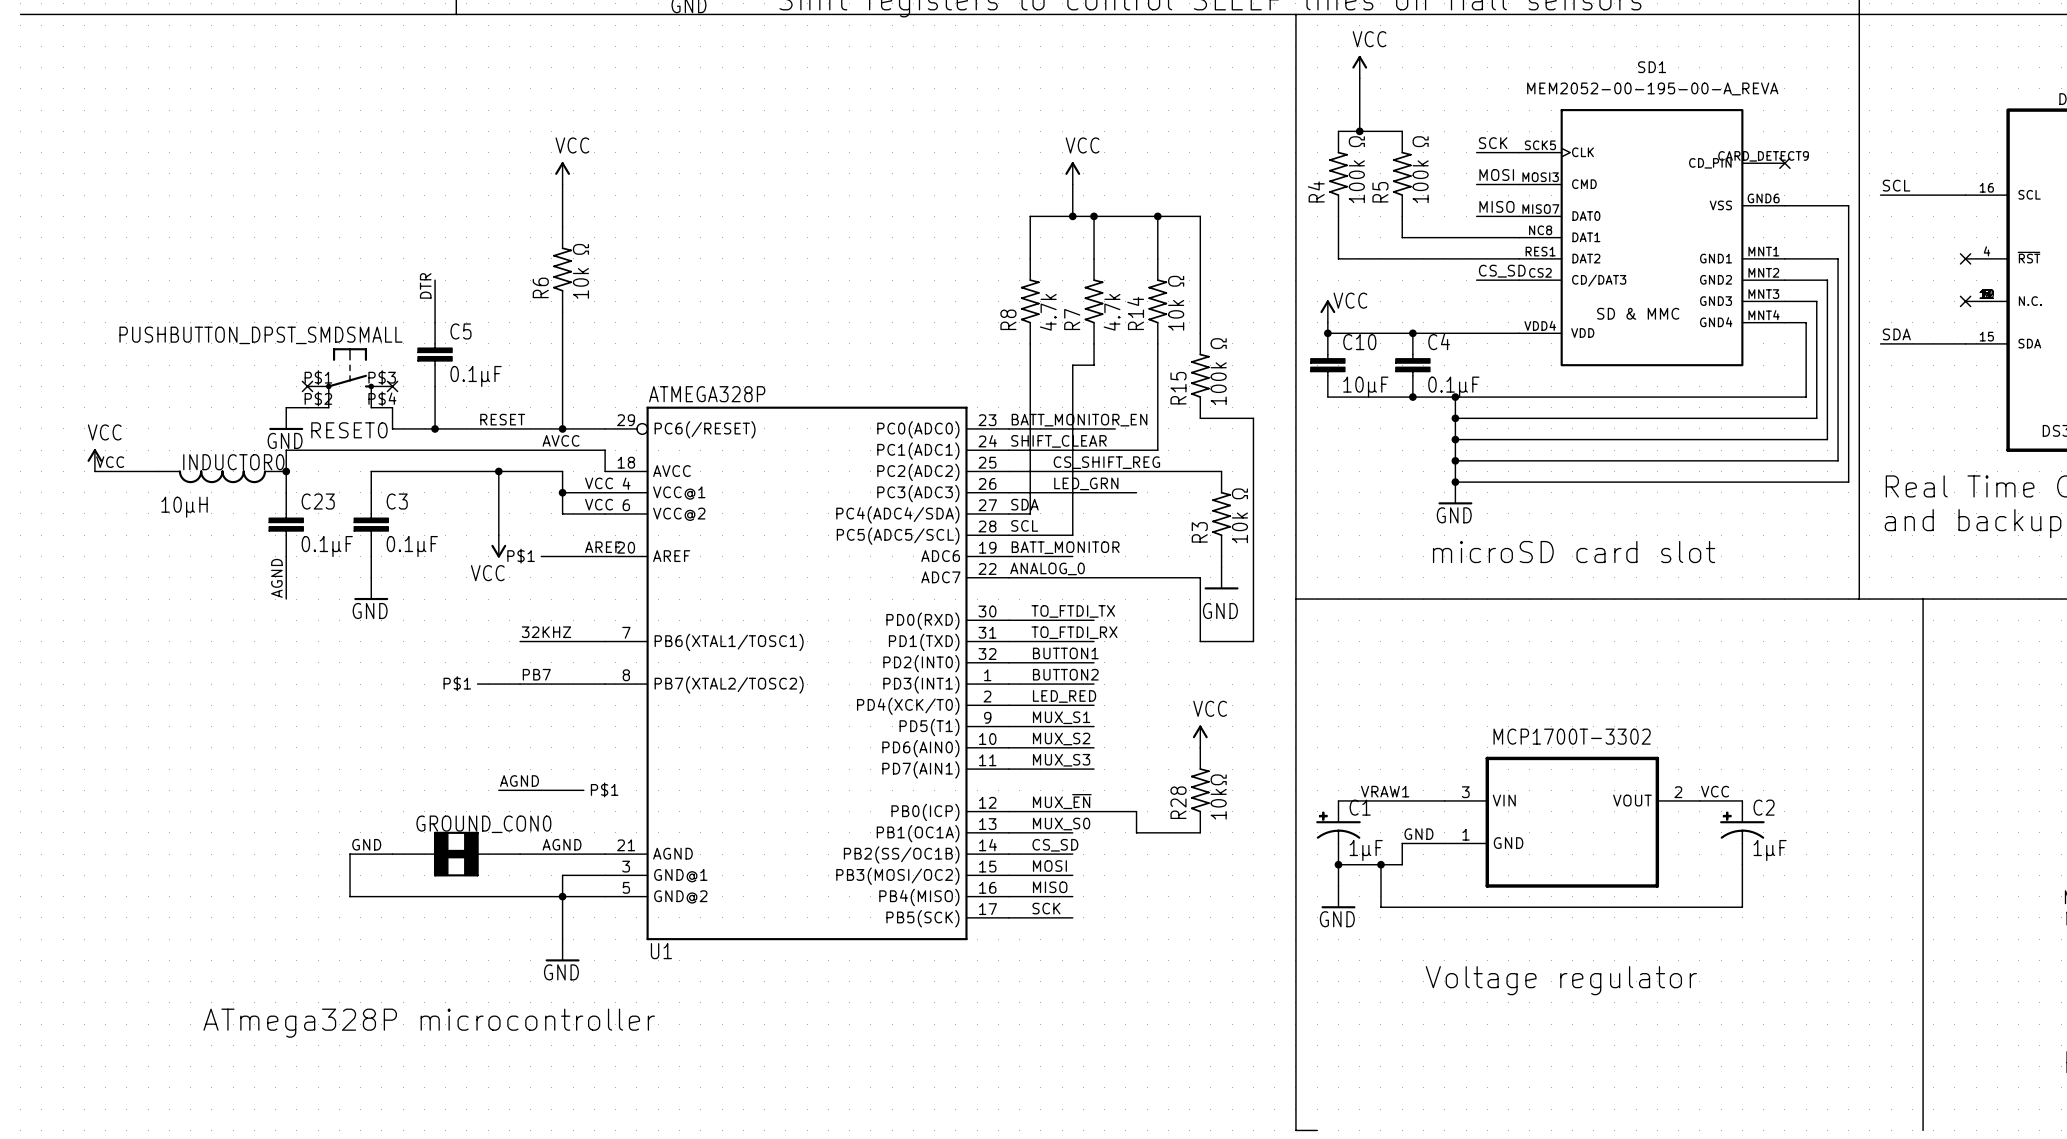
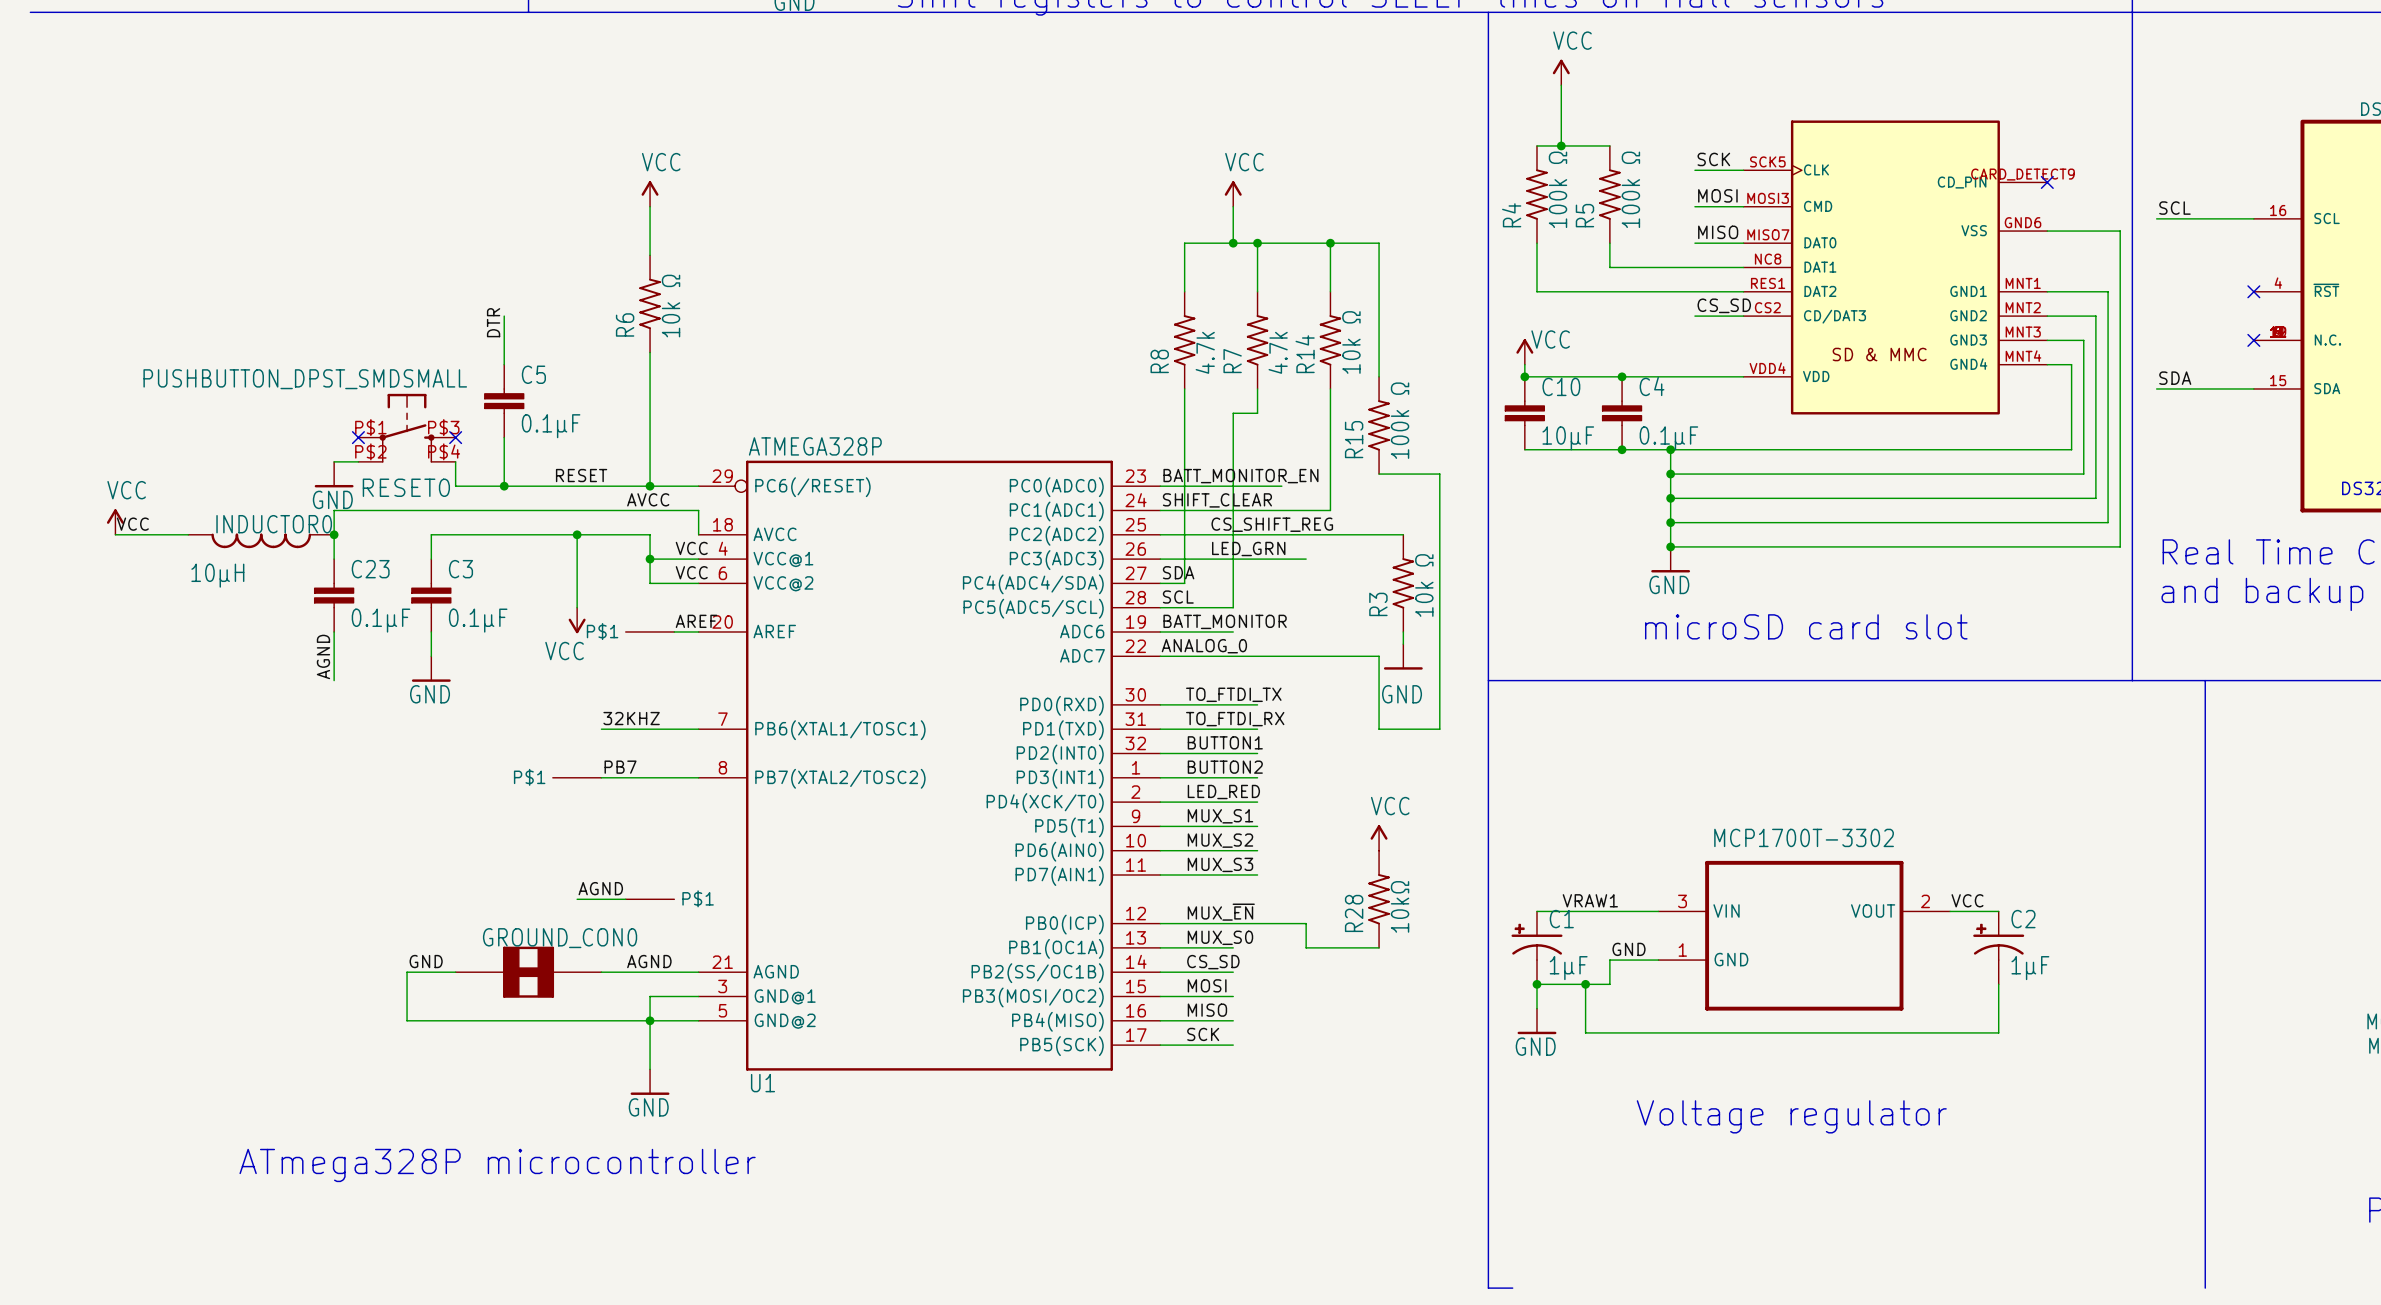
SD1 name: SD1 (1652, 67) -> none
SD1 value: MEM2052-00-195-00-A_REVA (1652, 88) -> none

